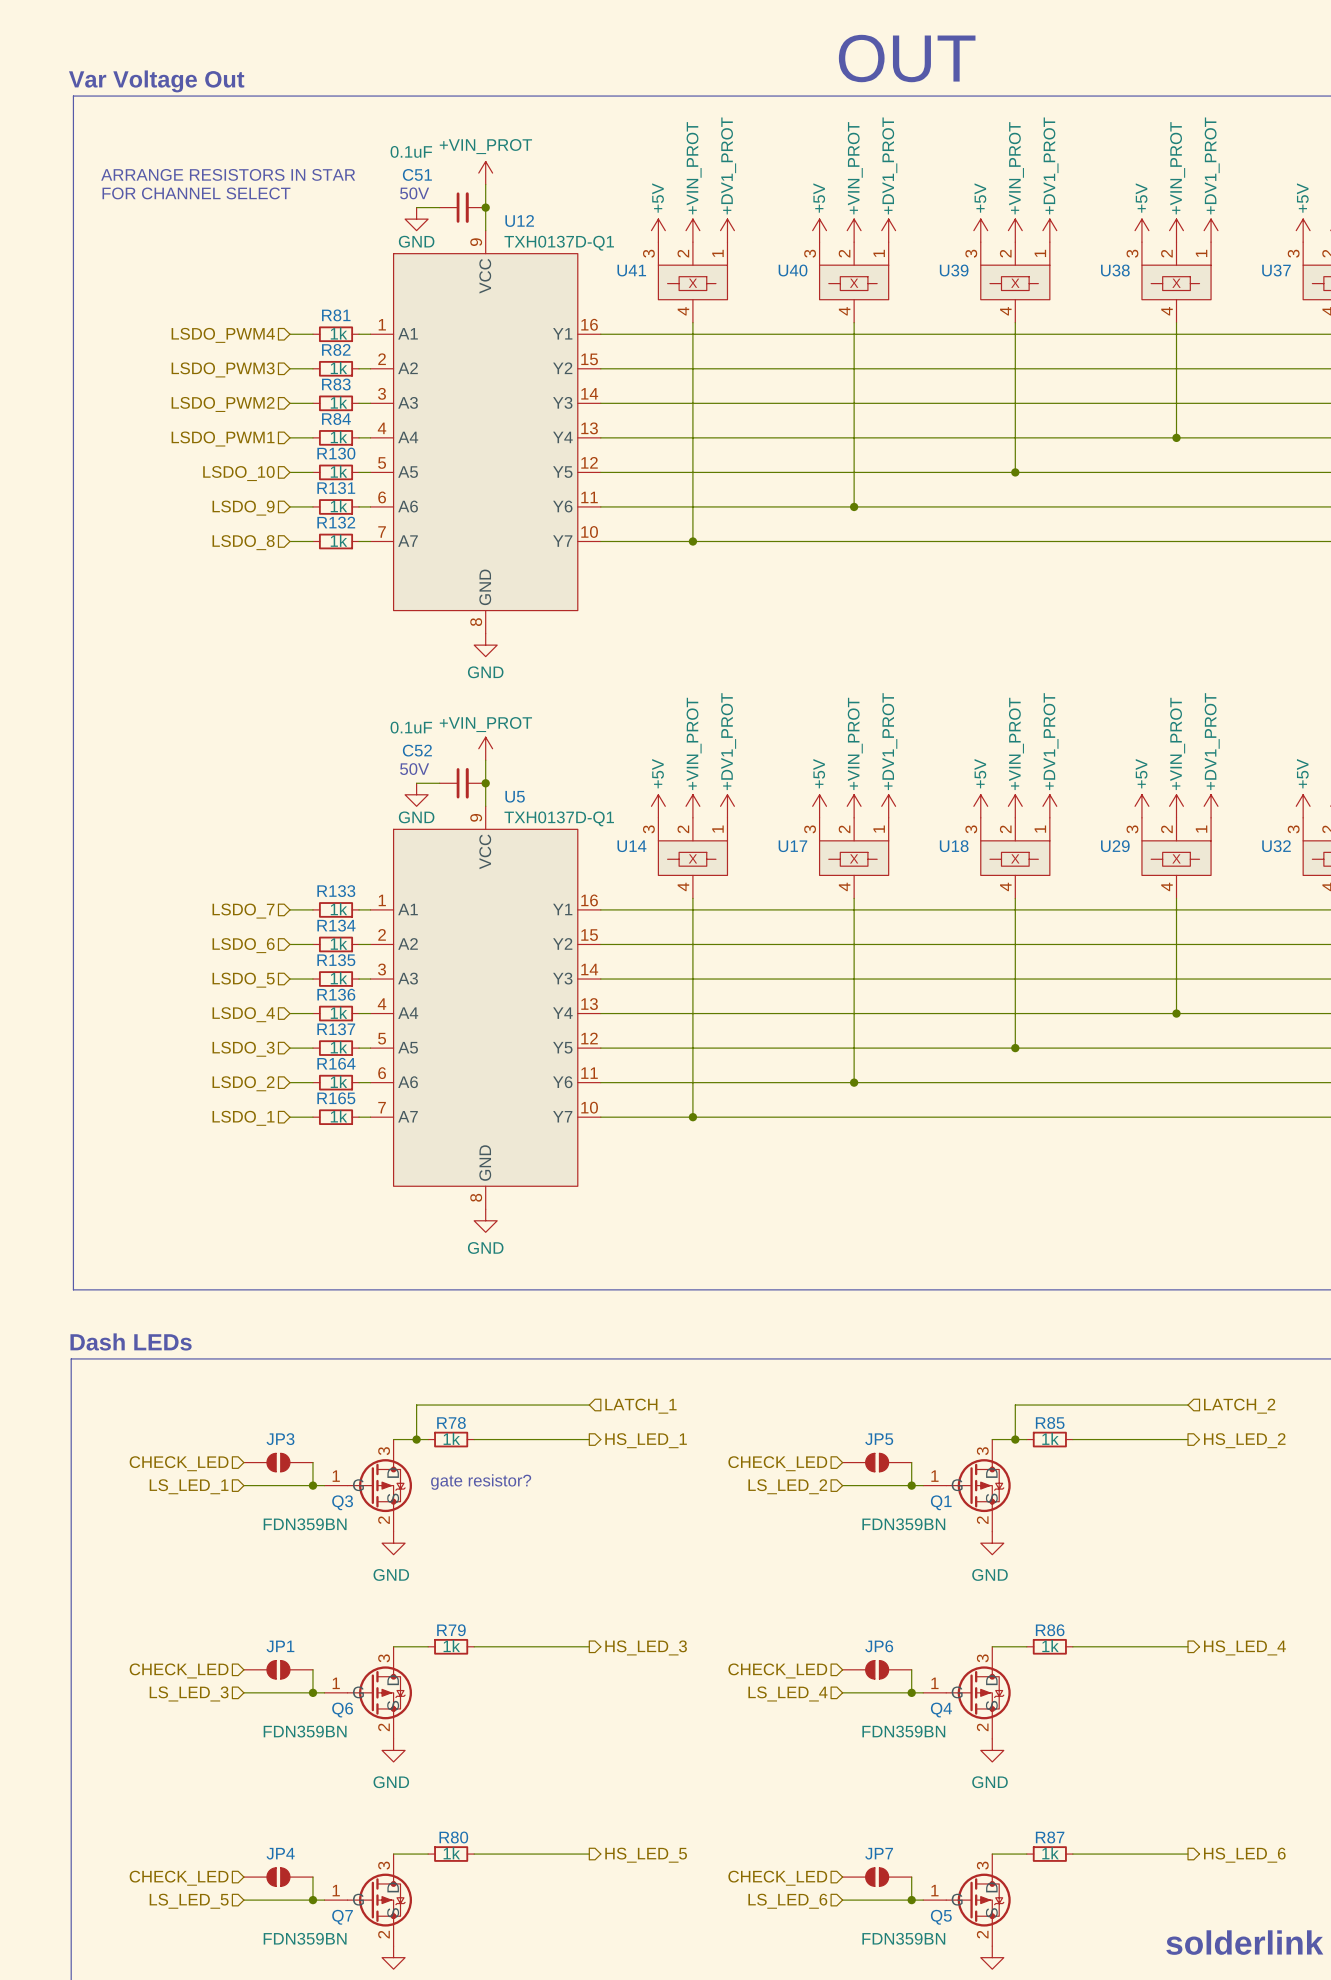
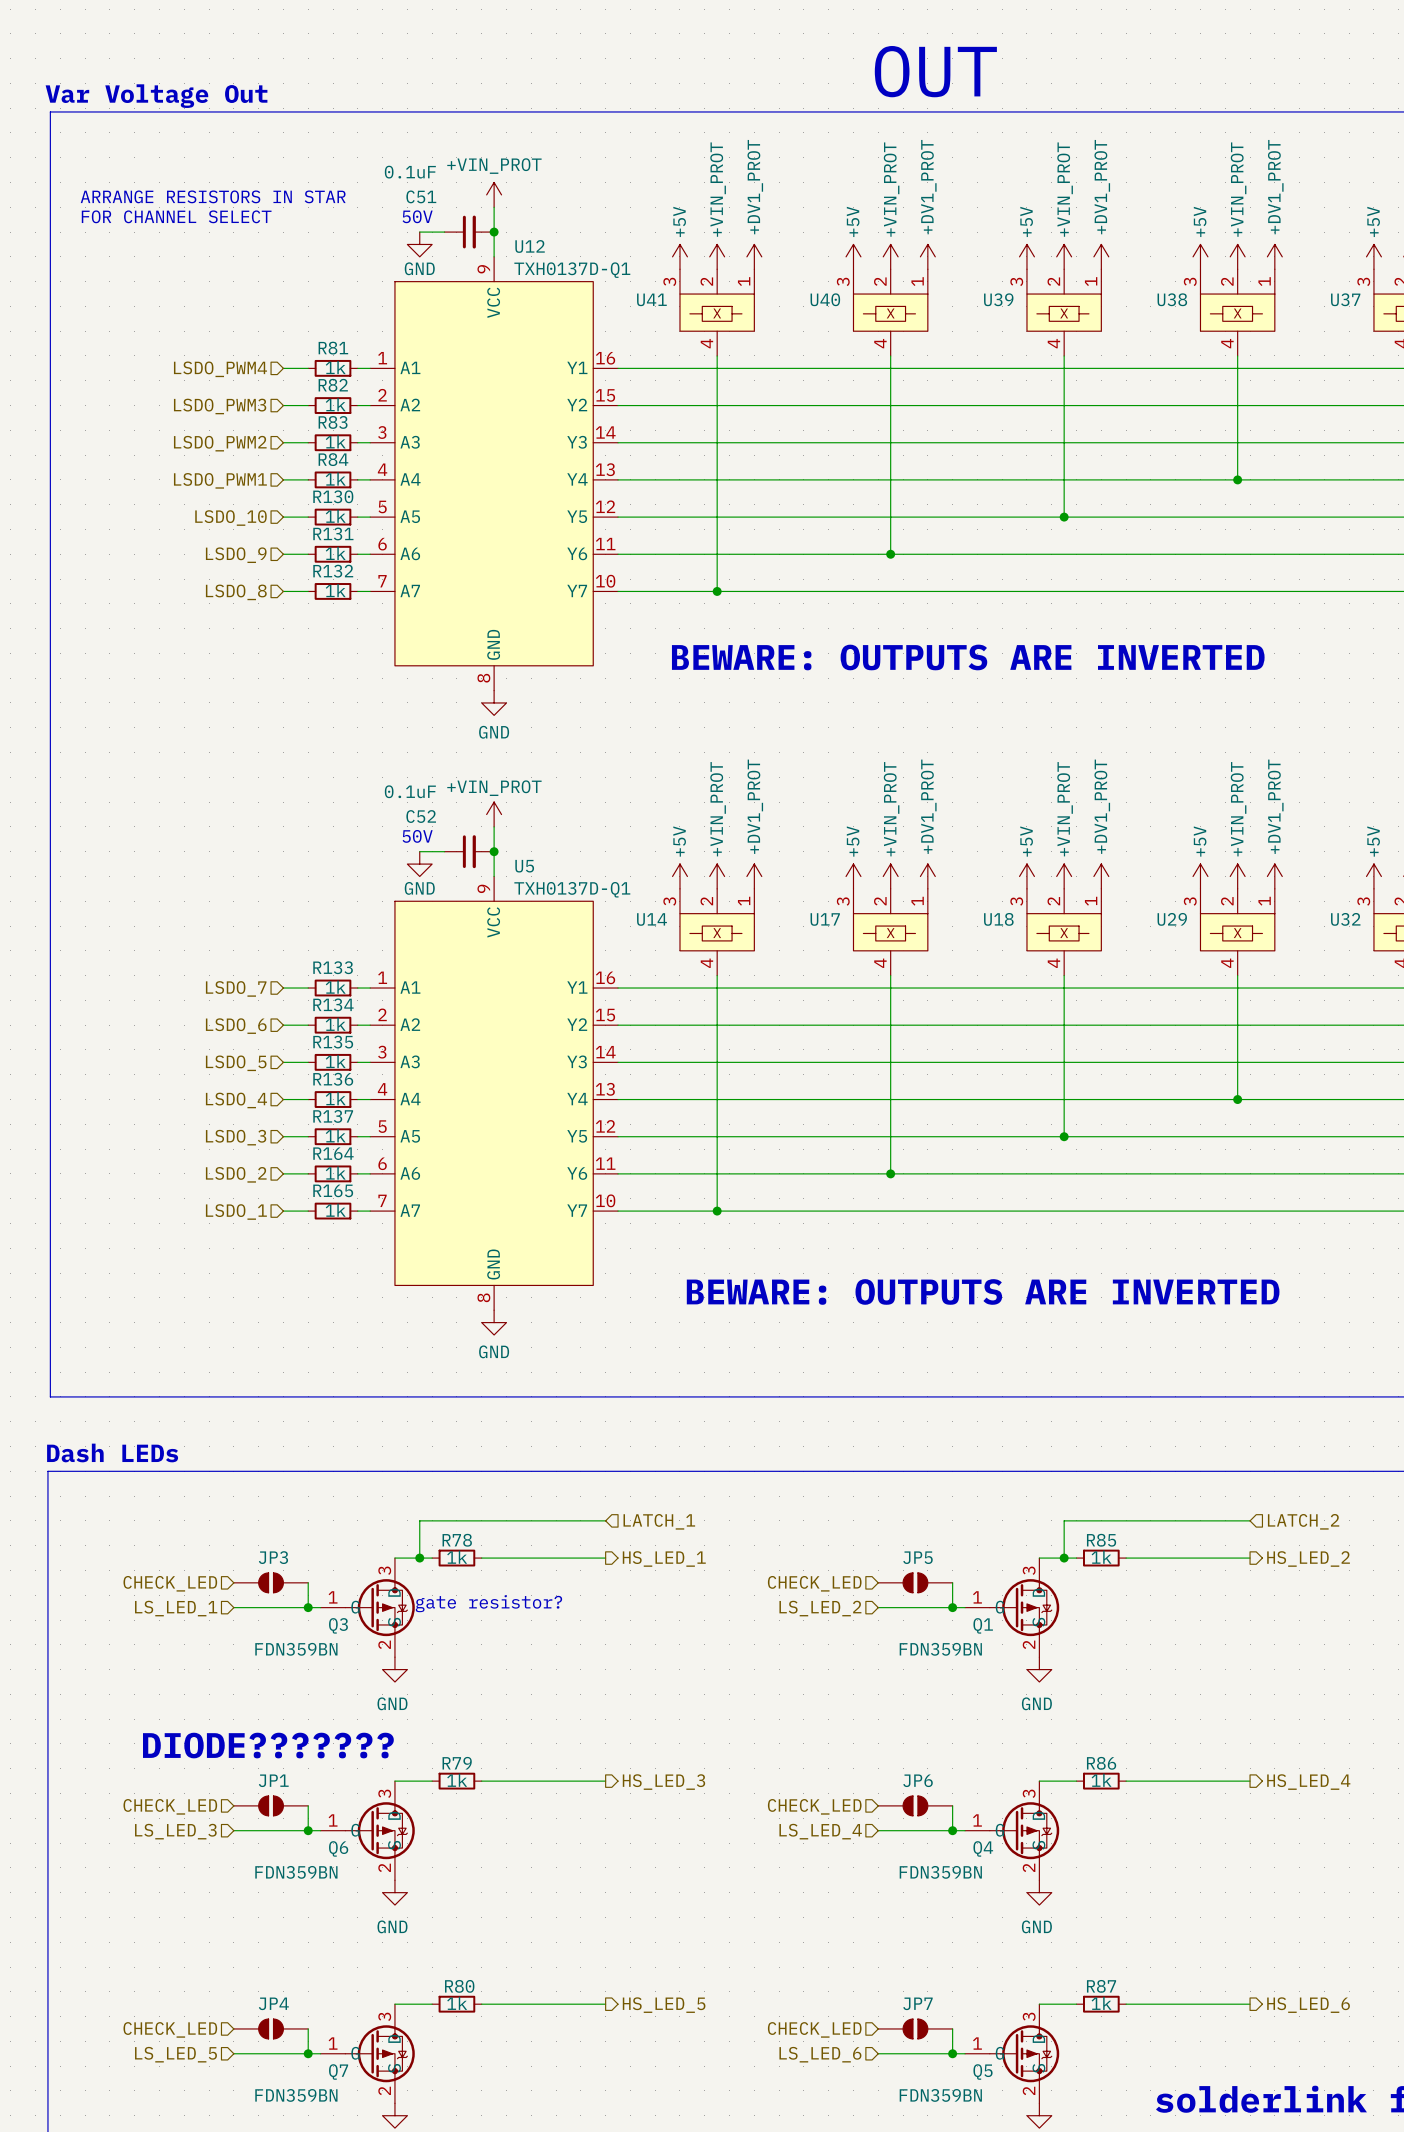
text: none -> BEWARE: OUTPUTS ARE INVERTED (968, 657)
text: none -> BEWARE: OUTPUTS ARE INVERTED (983, 1291)
text: none -> DIODE??????? (268, 1745)

